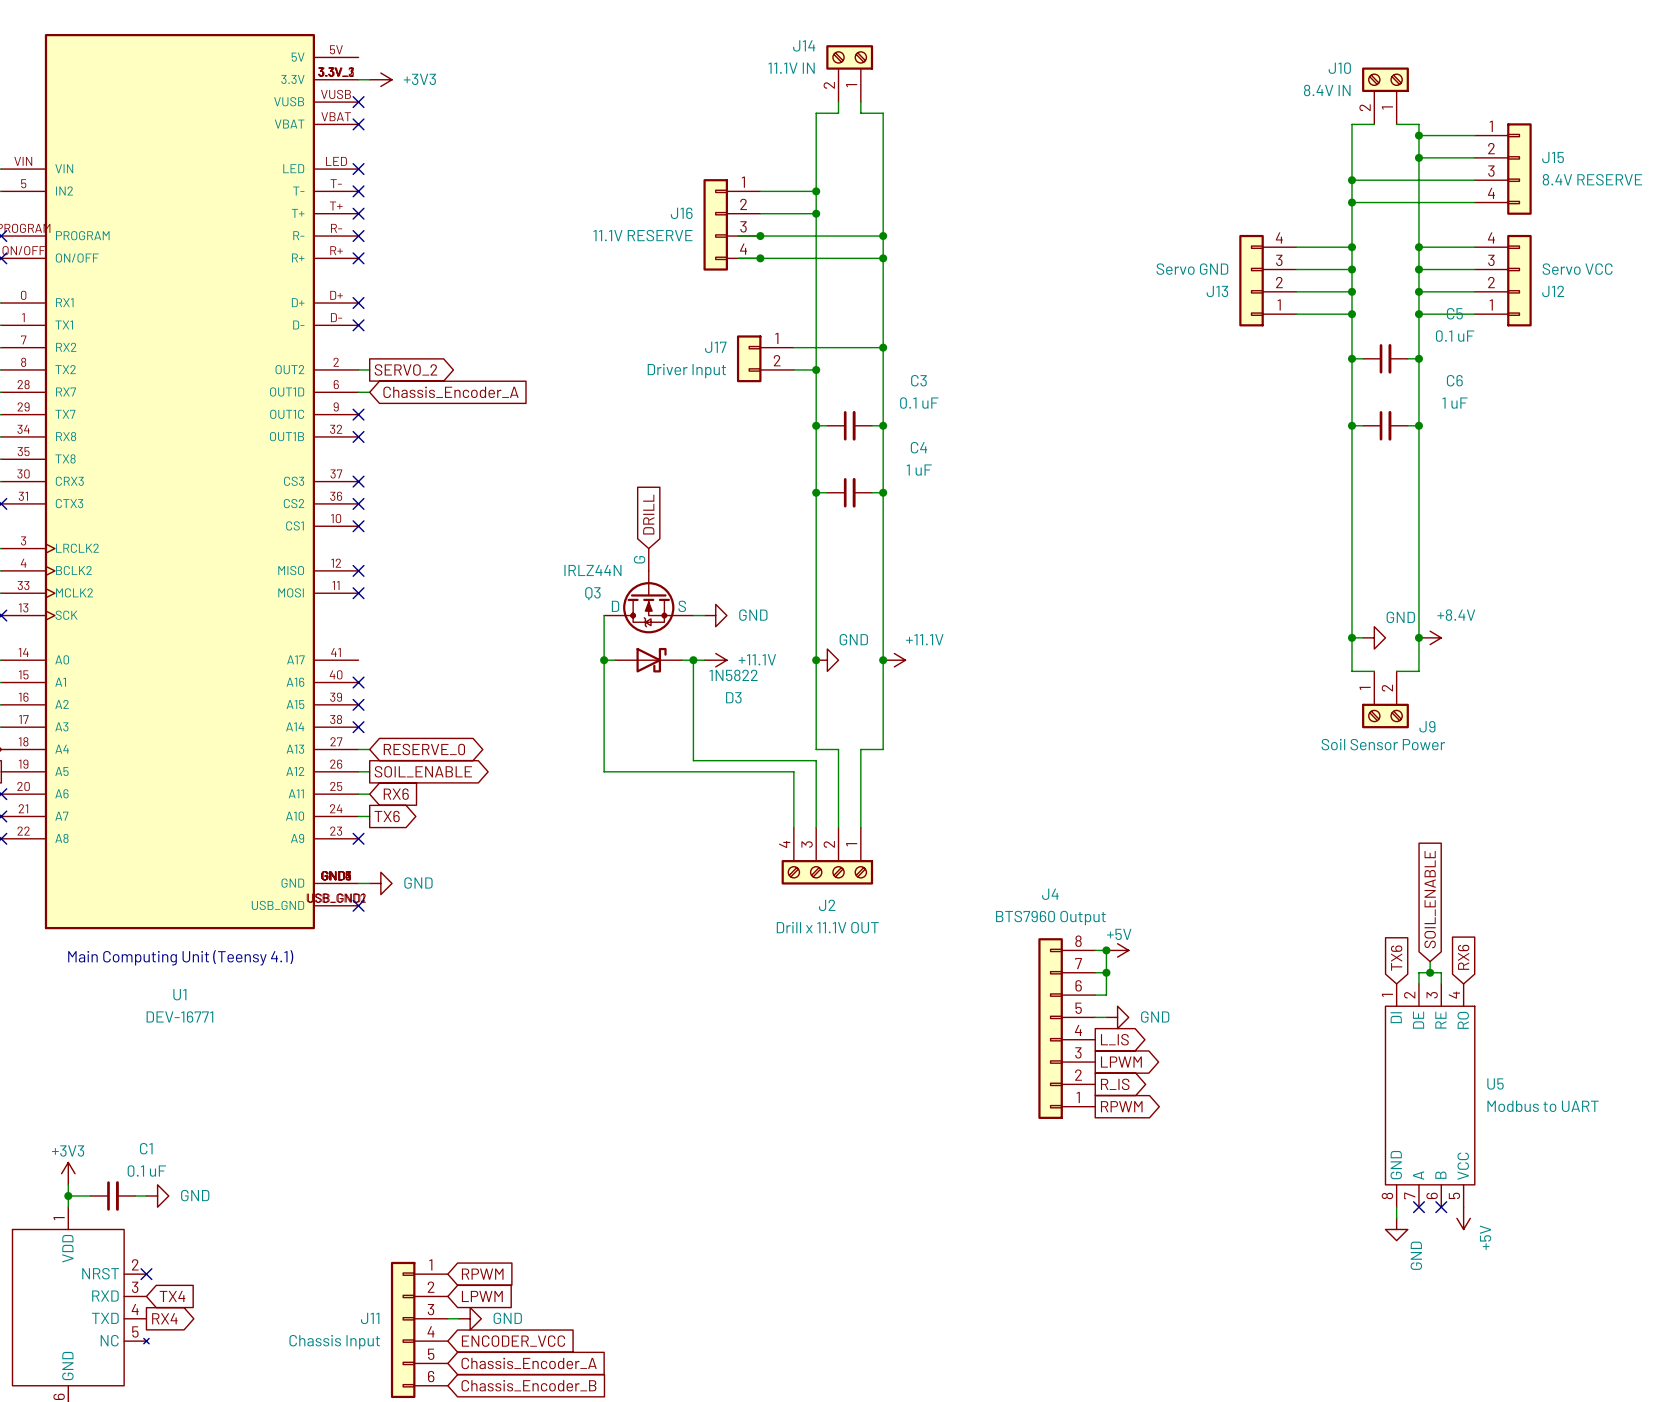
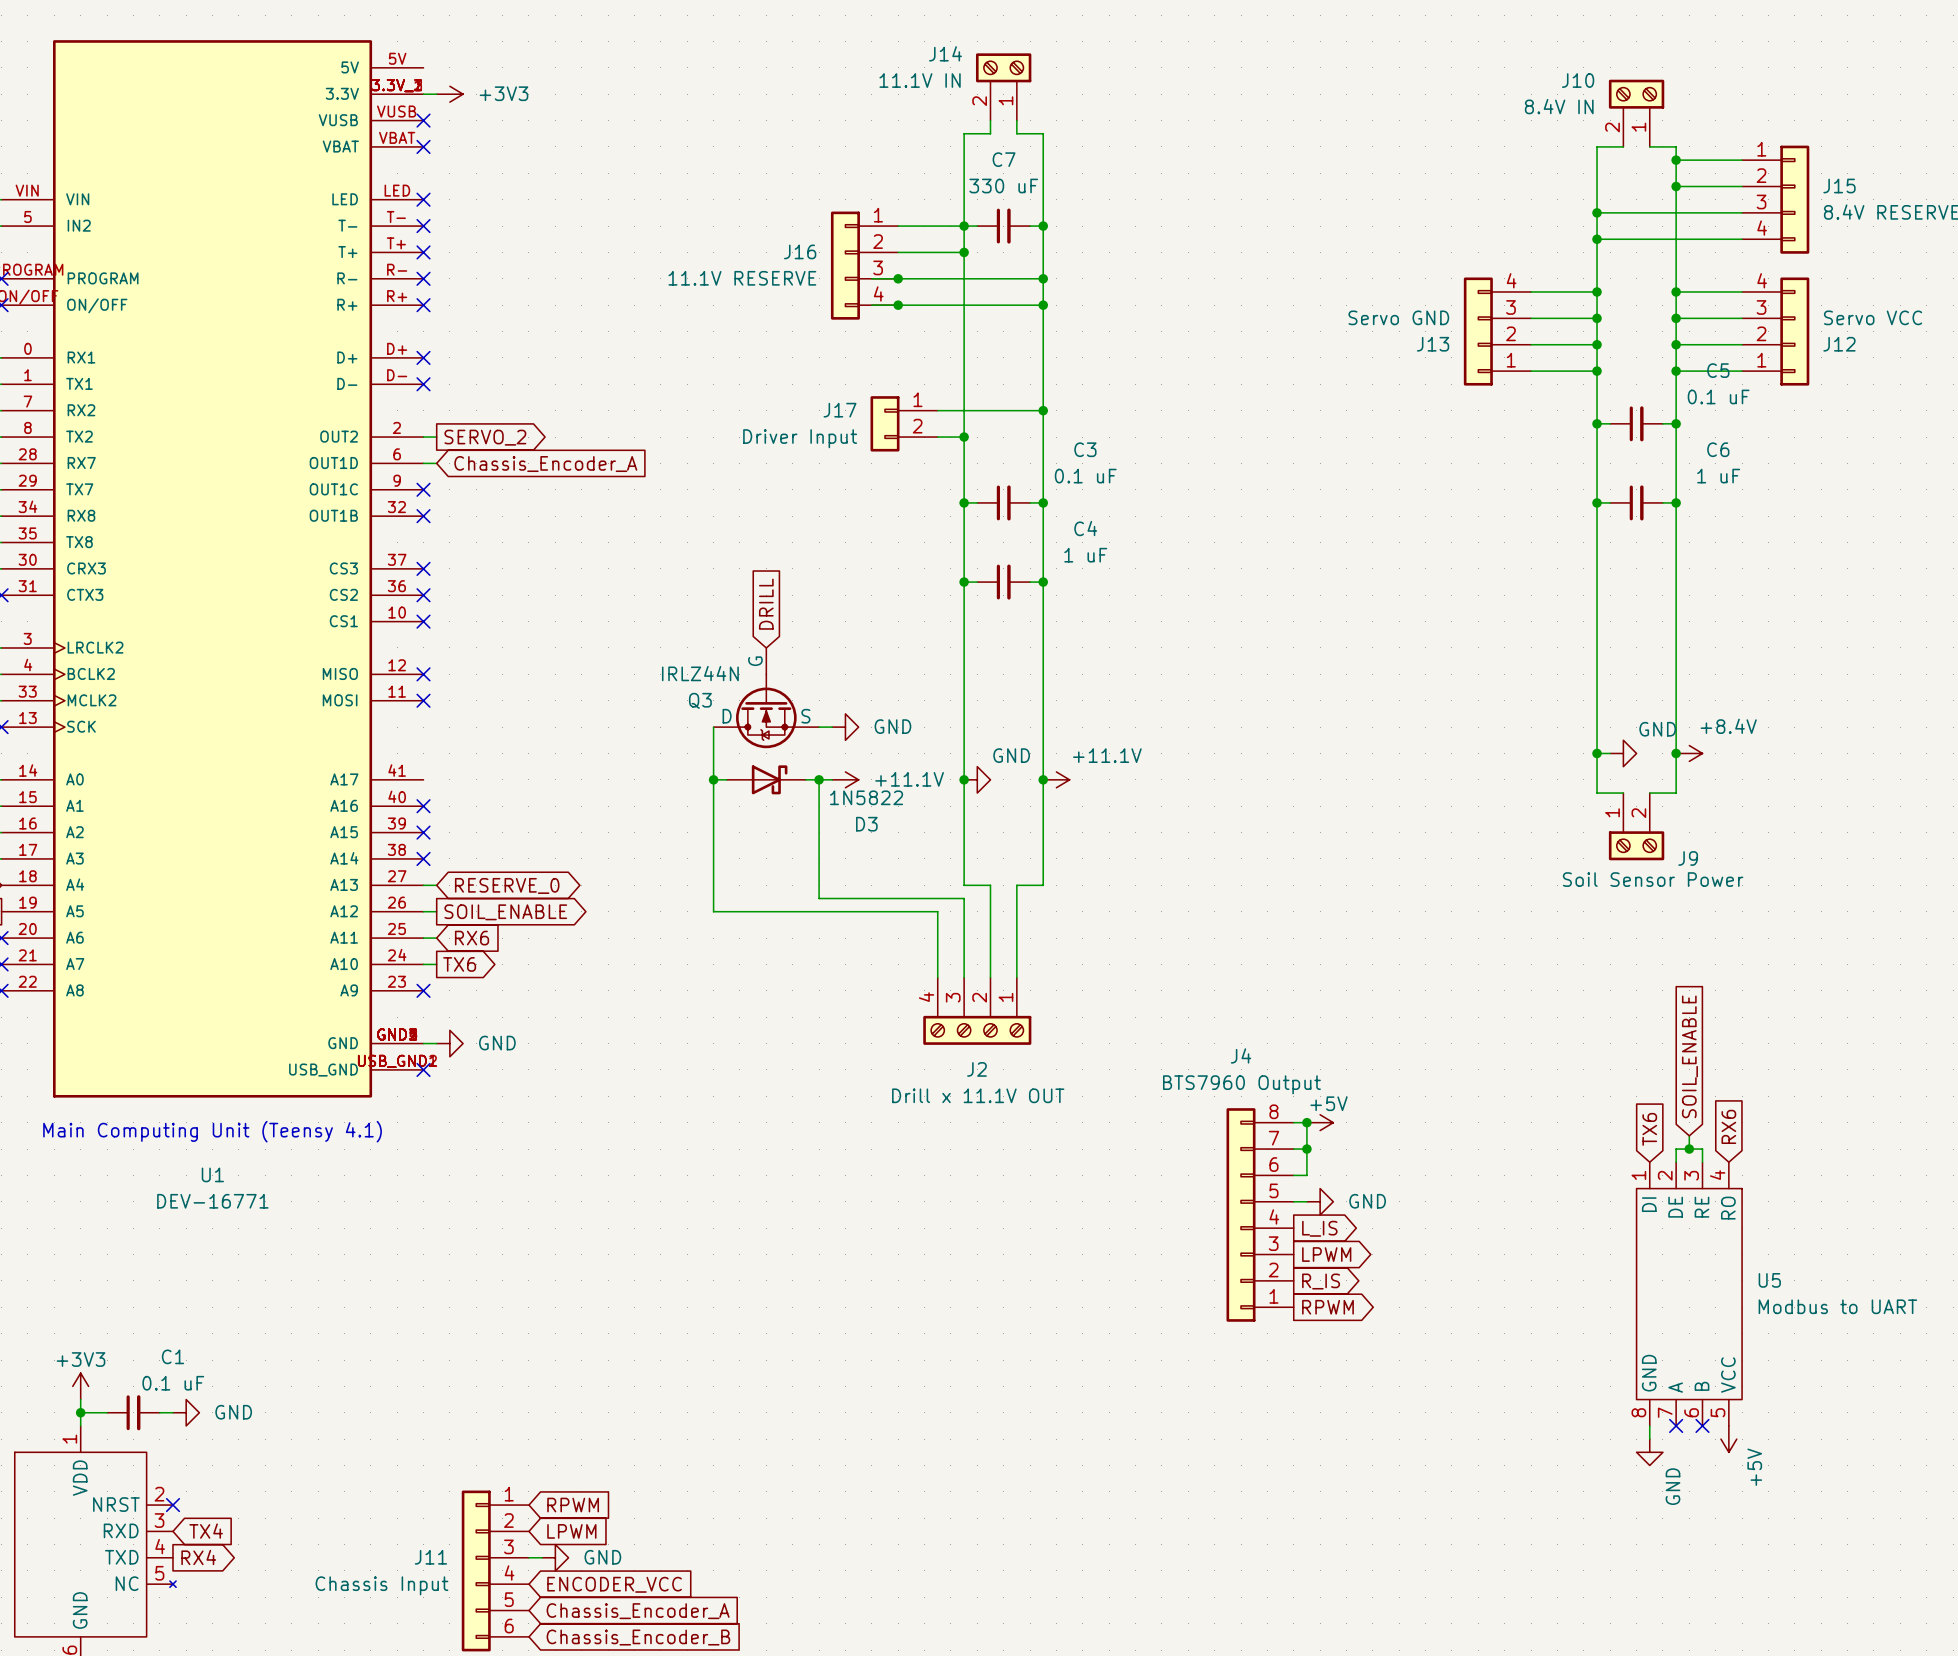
wire: none -> (964, 226) (977, 226)
C7: none -> 330 uF (1003, 226)
wire: none -> (1030, 226) (1043, 226)
junction: none -> (1043, 226)

